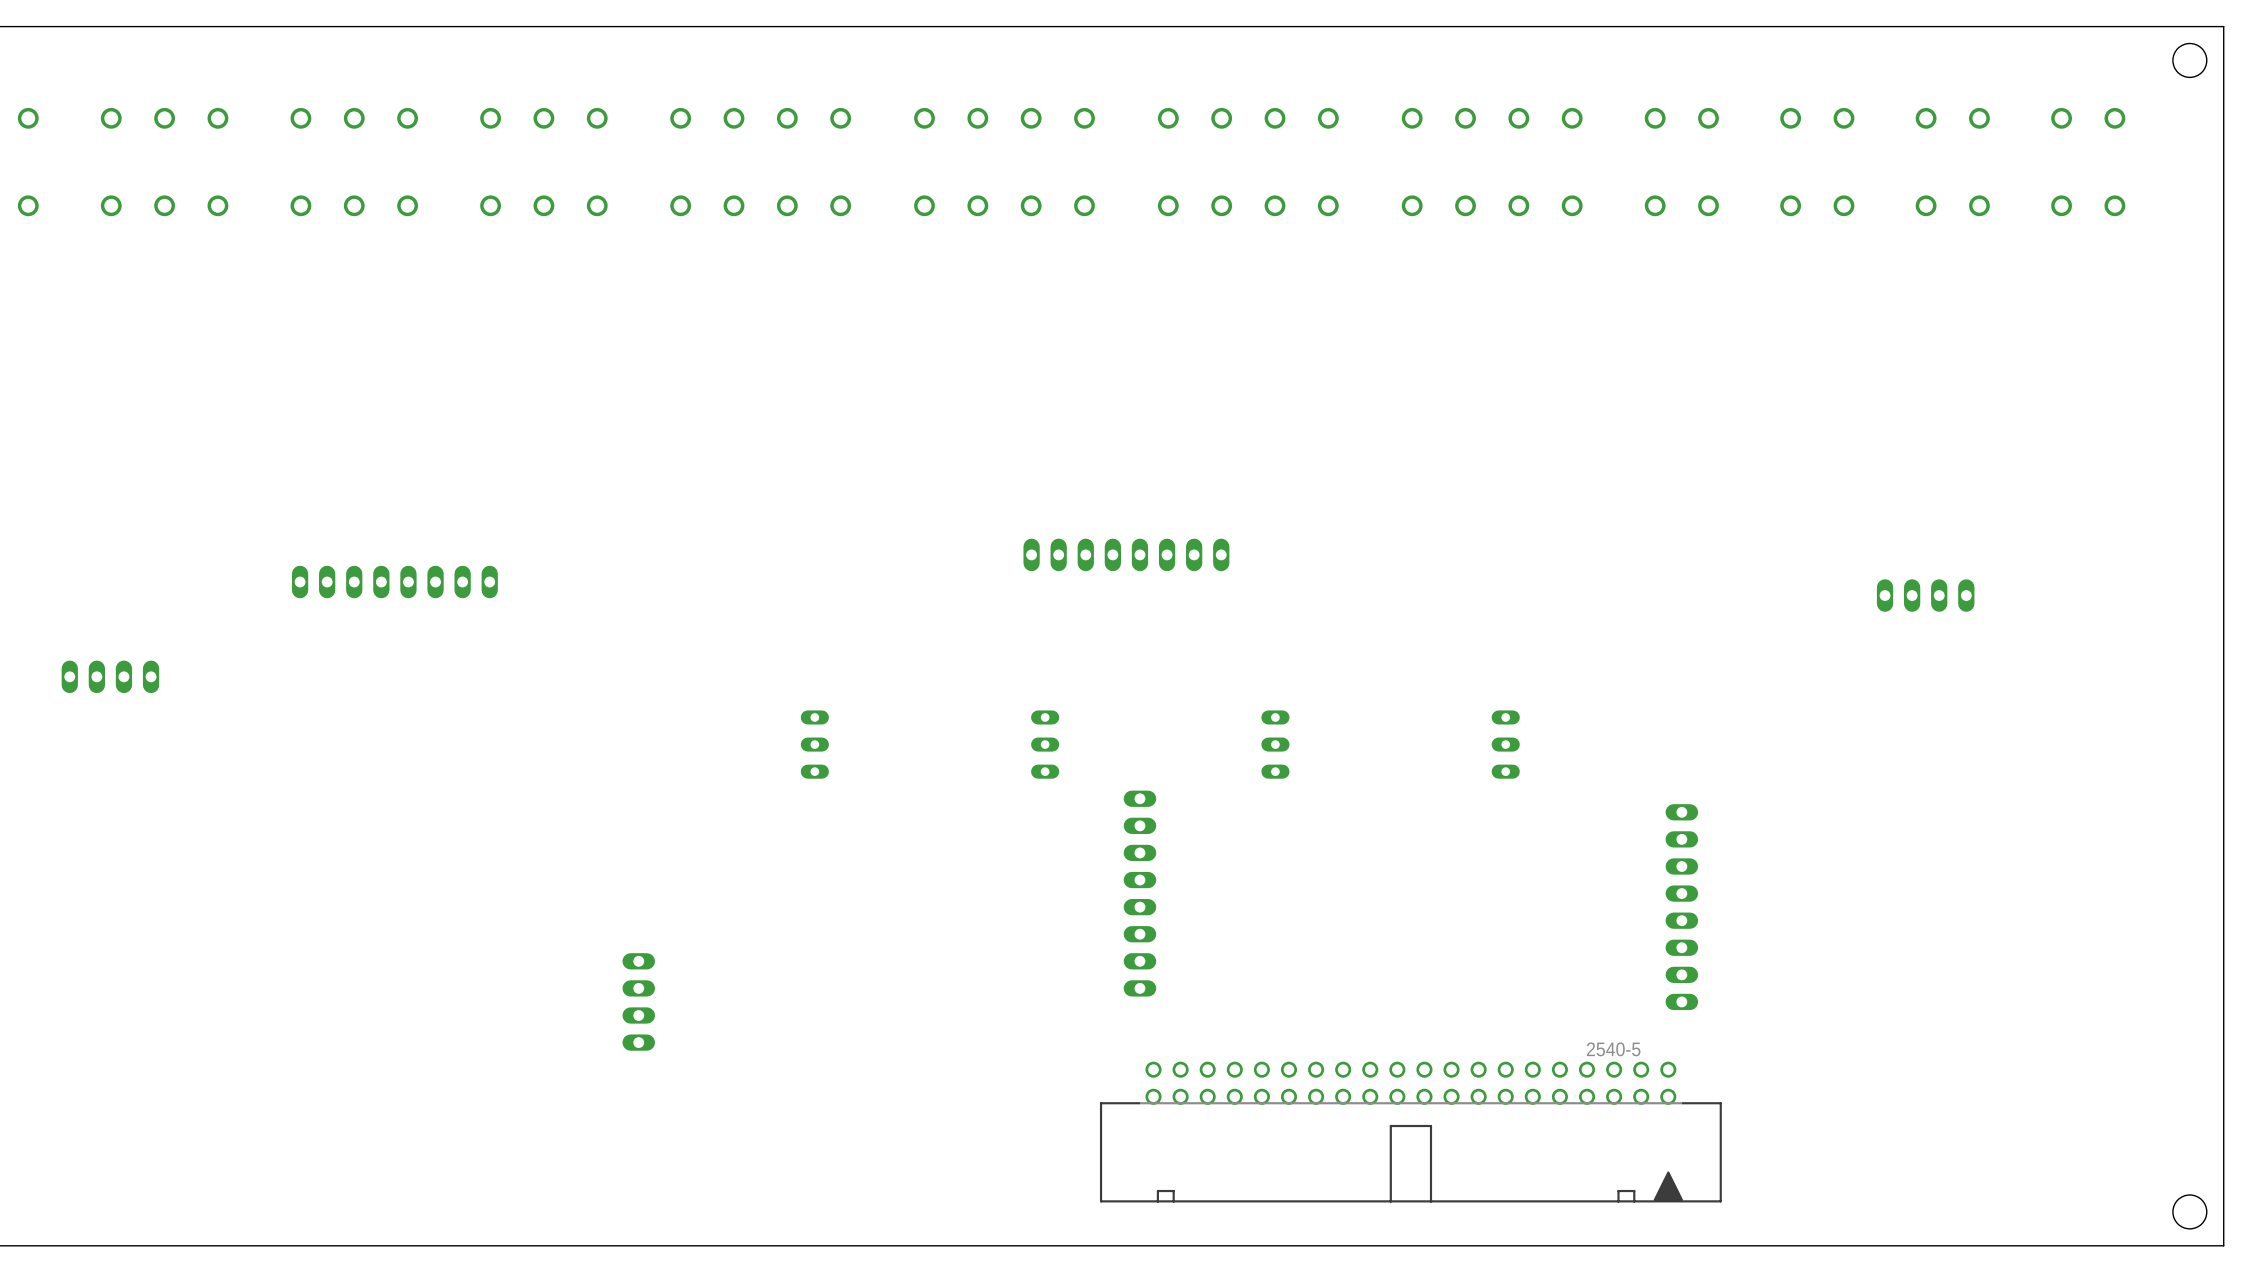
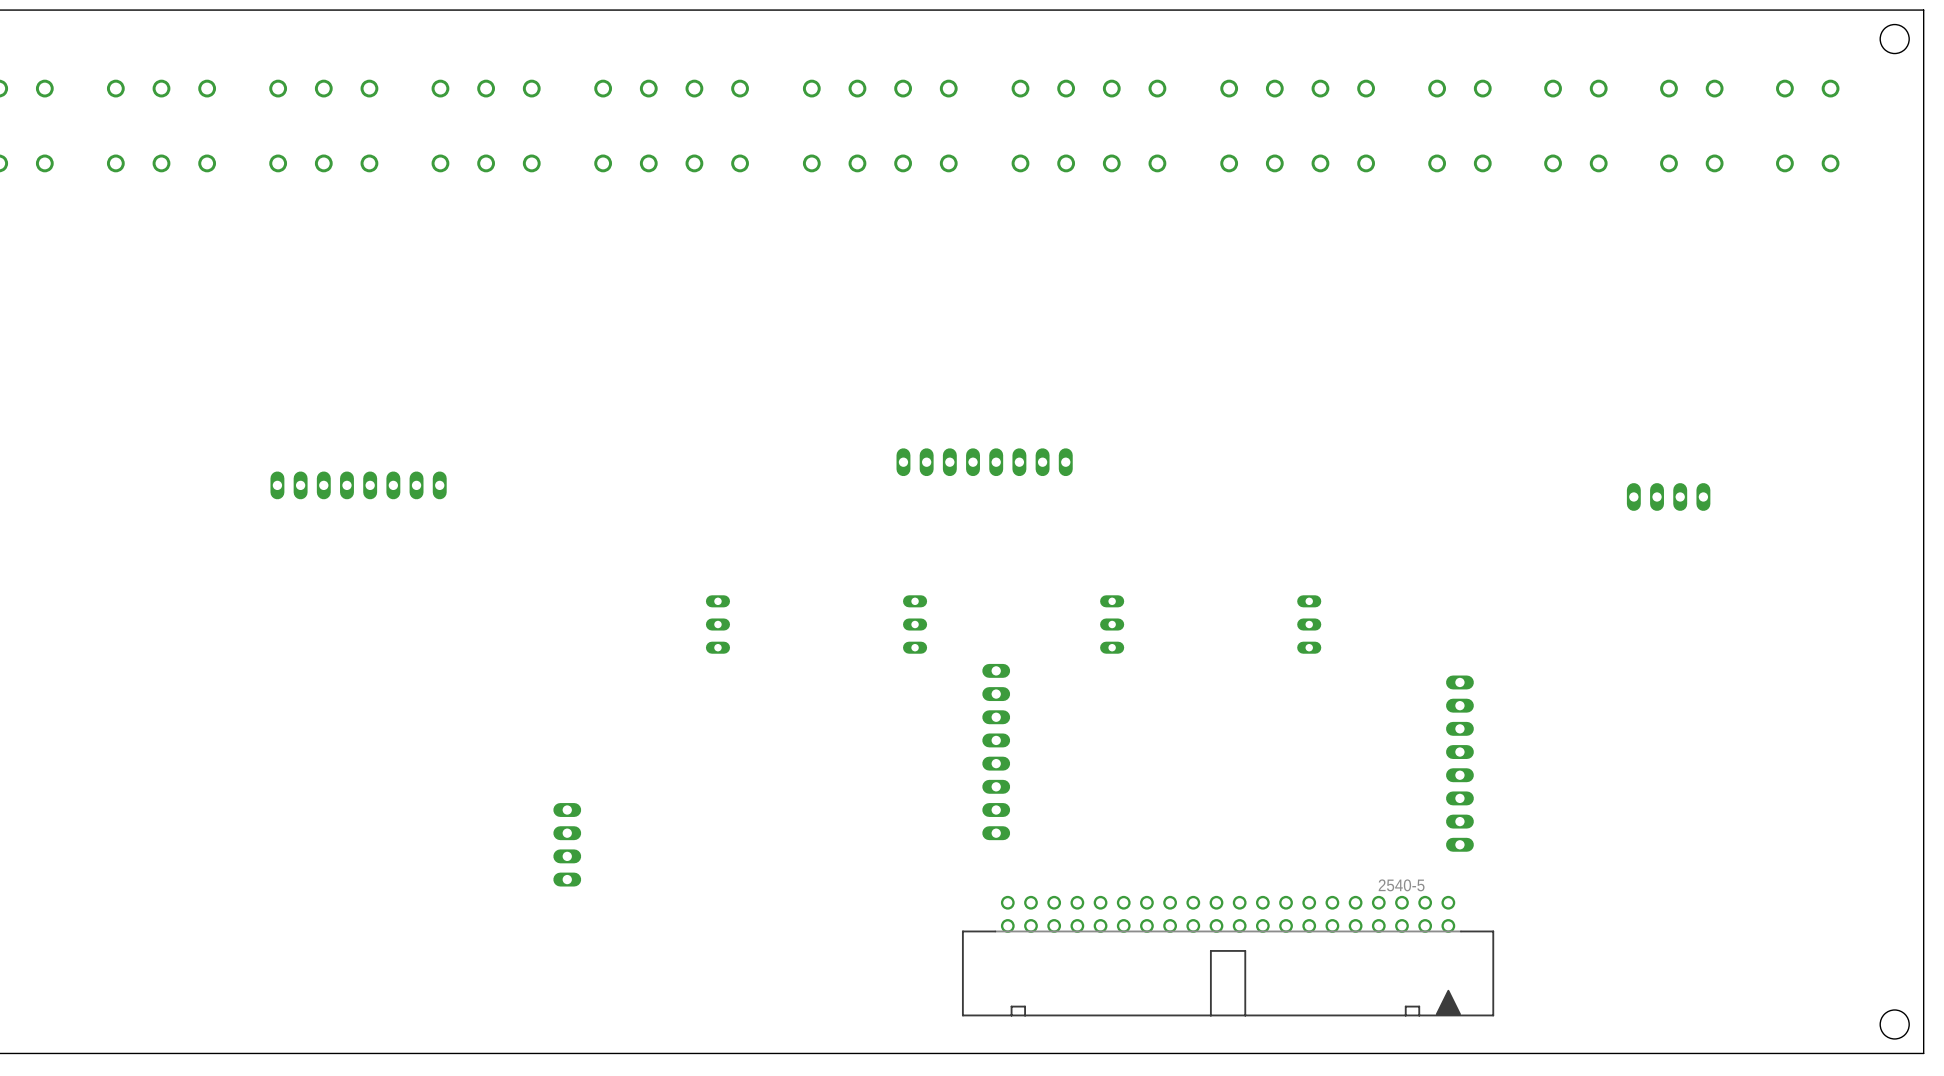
part: (110, 676) -> none

